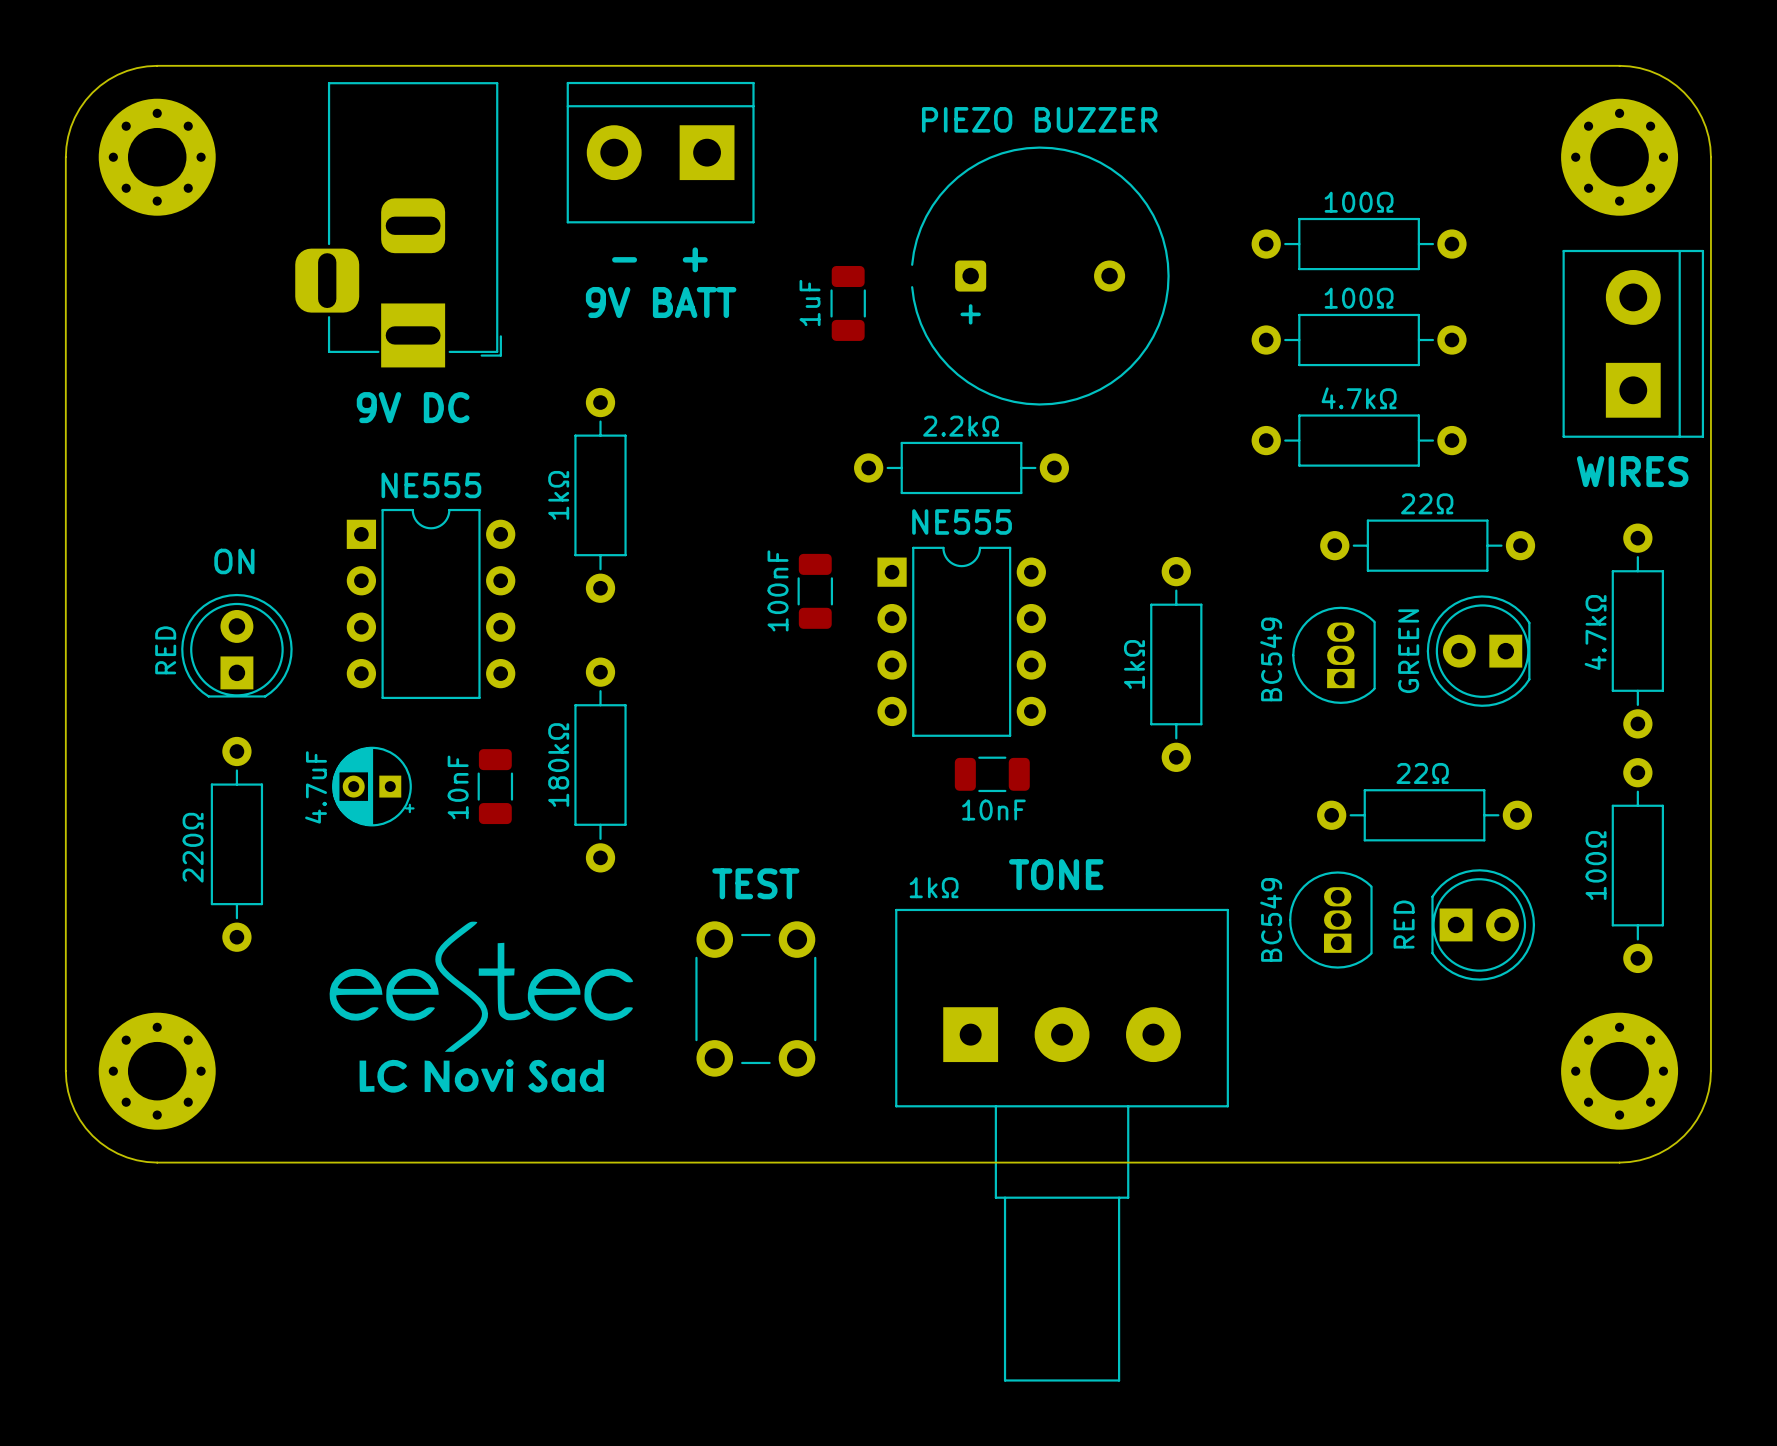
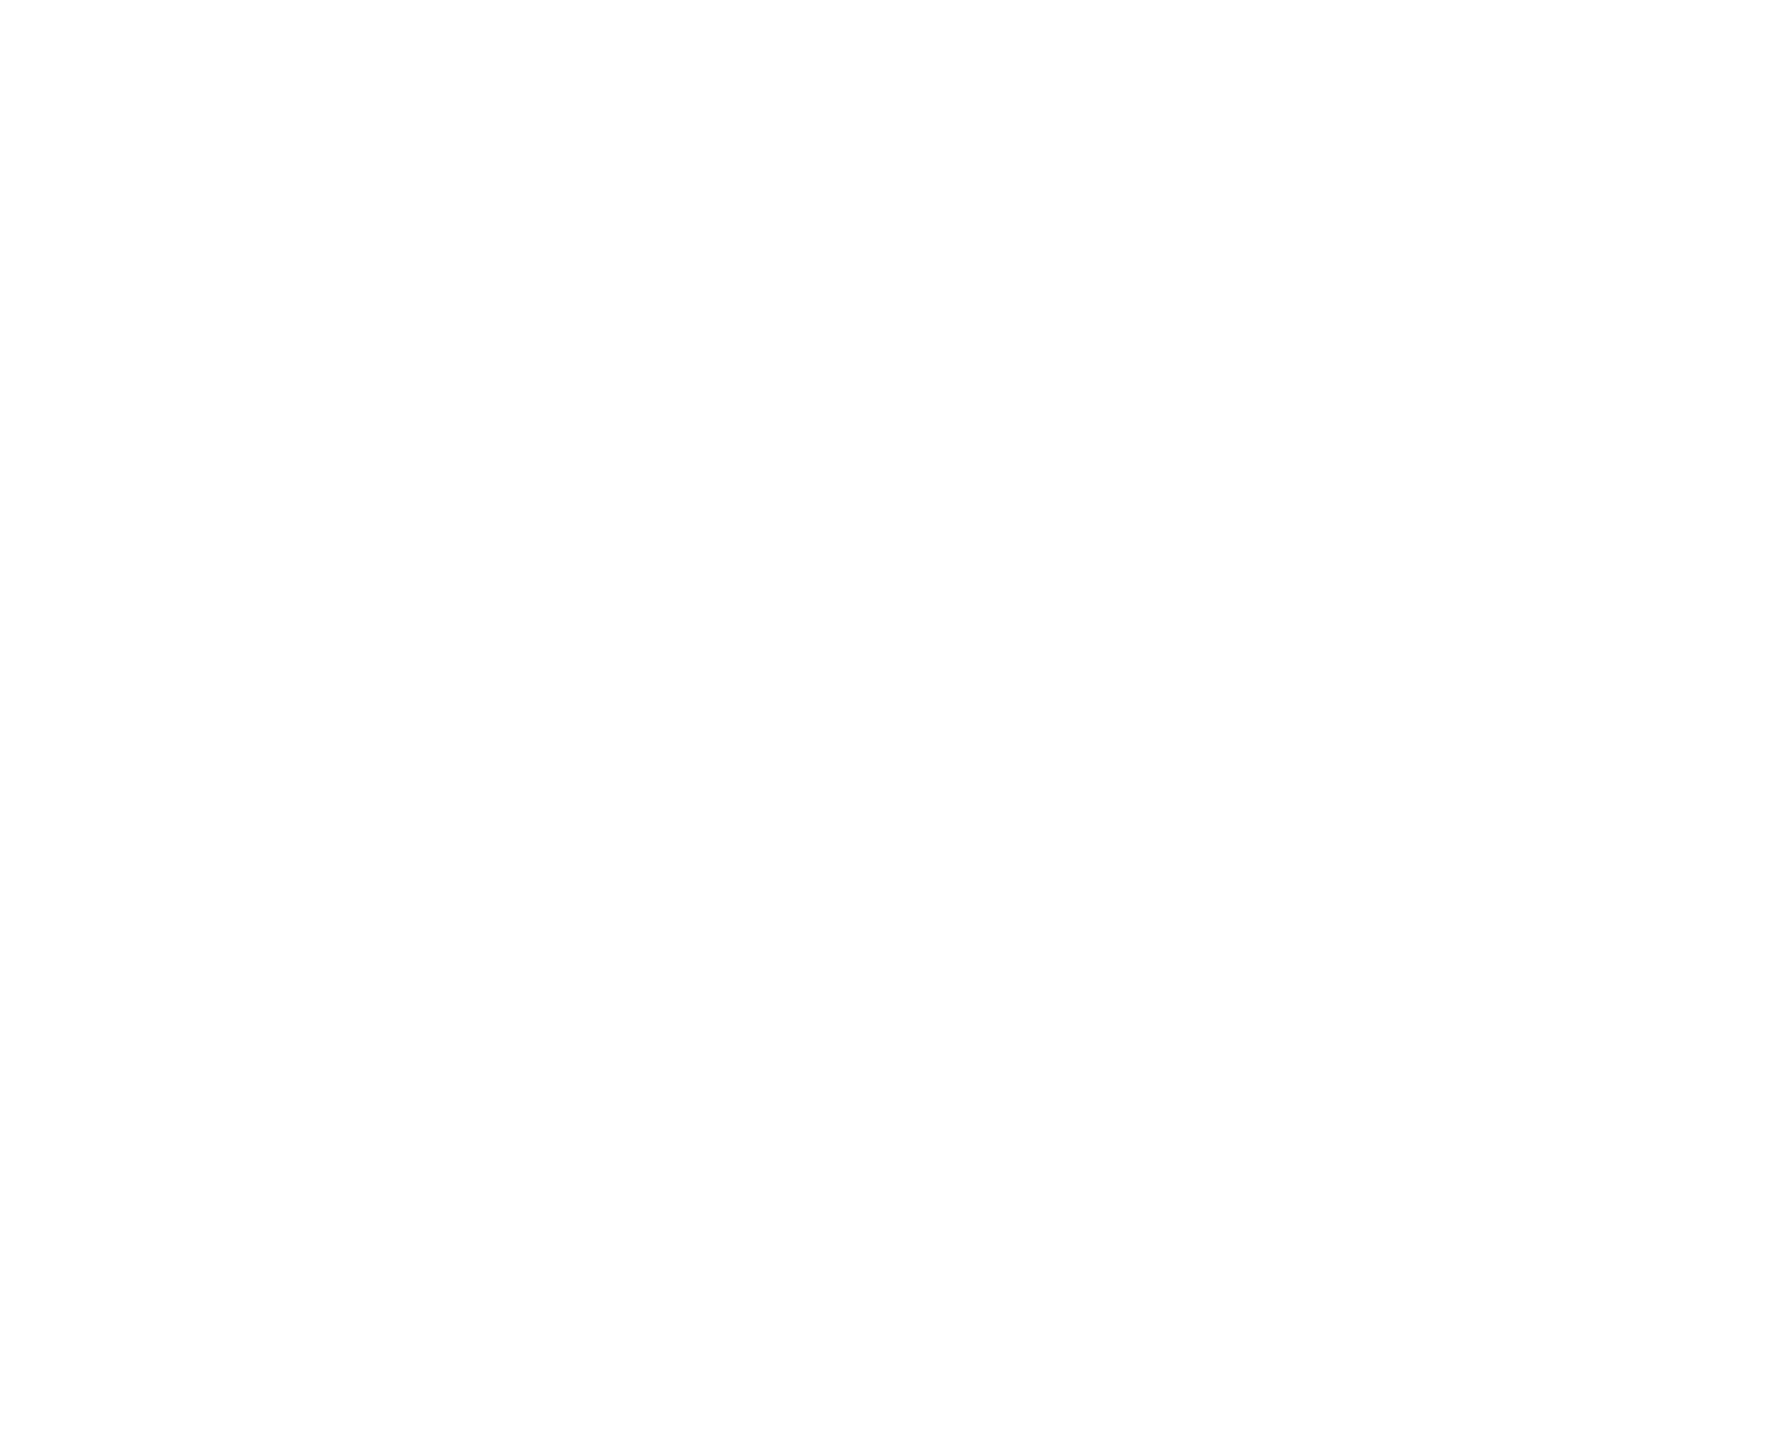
board edge: (157, 65) (1619, 65) (1649, 70) (1668, 79) (1684, 92) (1701, 117) (1708, 136) (1710, 157) (1710, 1071) (1705, 1101) (1696, 1119) (1676, 1142) (1659, 1153) (1639, 1160) (1619, 1162) (157, 1162) (136, 1160) (108, 1148) (92, 1135) (79, 1119) (70, 1101) (65, 1071) (65, 157) (68, 136) (74, 117) (92, 92) (108, 79) (127, 70) (157, 65) -> none
text: PIEZO BUZZER (1039, 119) -> none
part: (660, 152) -> none
part: (157, 157) -> none
part: (1619, 157) -> none
text: 100Ω (1359, 202) -> none
part: (398, 224) -> none
part: (1359, 244) -> none
text: - + (659, 259) -> none
part: (1040, 276) -> none
text: 100Ω (1359, 298) -> none
text: 9V BATT (661, 302) -> none
text: 1uF (810, 303) -> none
part: (848, 303) -> none
text: + (970, 314) -> none
part: (1359, 340) -> none
part: (1633, 343) -> none
text: 4.7kΩ (1359, 398) -> none
text: 9V DC (413, 407) -> none
text: 2.2kΩ (961, 426) -> none
part: (1359, 440) -> none
part: (961, 467) -> none
text: WIRES (1632, 471) -> none
text: NE555 (431, 485) -> none
text: 1kΩ (558, 495) -> none
part: (600, 495) -> none
text: 22Ω (1427, 503) -> none
text: NE555 (962, 521) -> none
part: (1427, 545) -> none
text: ON (234, 561) -> none
text: 100nF (778, 590) -> none
part: (815, 591) -> none
part: (431, 603) -> none
part: (1637, 631) -> none
text: 4.7kΩ (1595, 632) -> none
part: (961, 641) -> none
part: (236, 645) -> none
text: RED (165, 650) -> none
text: GREEN (1408, 651) -> none
part: (1478, 651) -> none
part: (1333, 655) -> none
text: BC549 (1271, 659) -> none
text: 1kΩ (1134, 664) -> none
part: (1176, 664) -> none
text: 180kΩ (558, 765) -> none
part: (600, 765) -> none
text: 22Ω (1422, 773) -> none
part: (992, 774) -> none
part: (373, 786) -> none
part: (495, 786) -> none
text: 4.7uF (316, 787) -> none
text: 10nF (458, 787) -> none
text: 10nF (993, 810) -> none
part: (1424, 815) -> none
part: (236, 844) -> none
text: 220Ω (193, 847) -> none
text: 100Ω (1596, 865) -> none
part: (1637, 865) -> none
text: TONE (1056, 874) -> none
text: TEST (755, 883) -> none
text: 1kΩ (934, 887) -> none
text: BC549 (1271, 919) -> none
part: (1330, 920) -> none
drawing: [329, 921, 634, 1093] -> none
text: RED (1404, 924) -> none
part: (1483, 924) -> none
part: (755, 998) -> none
part: (157, 1071) -> none
part: (1619, 1071) -> none
part: (1062, 1145) -> none

